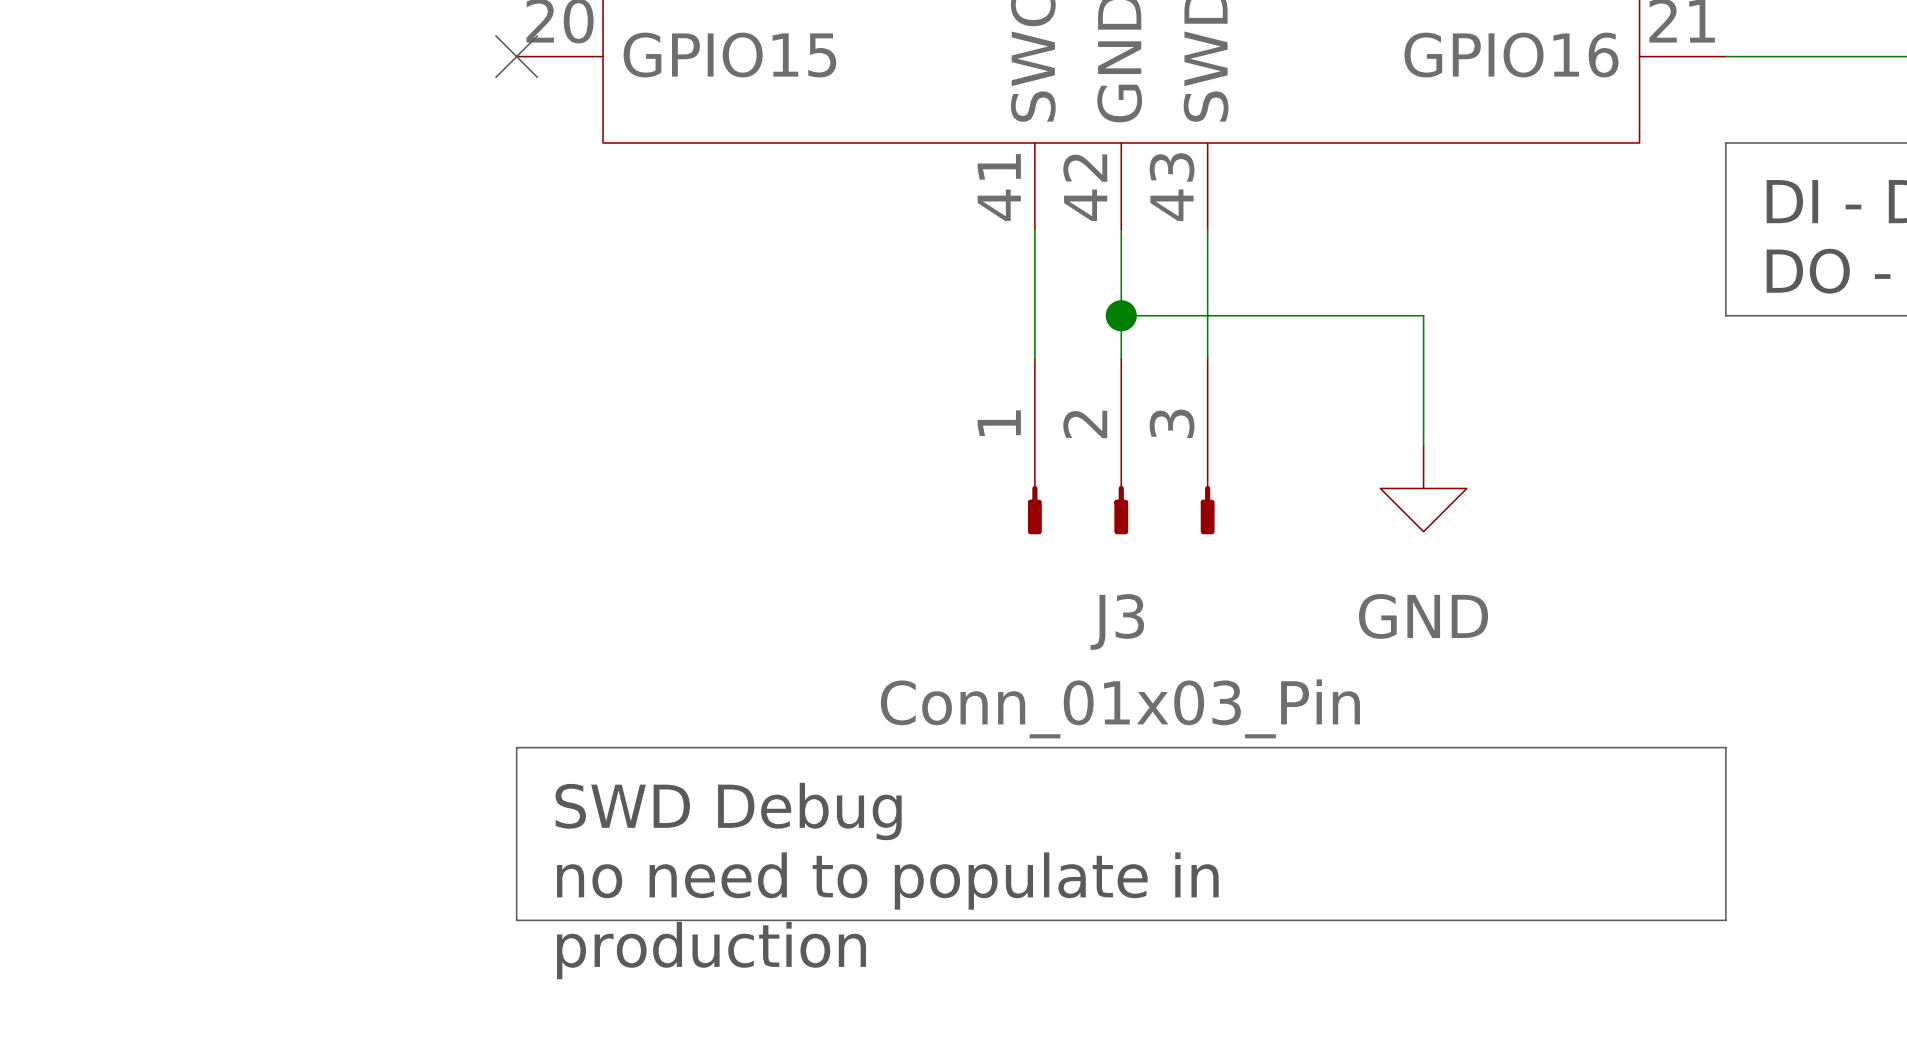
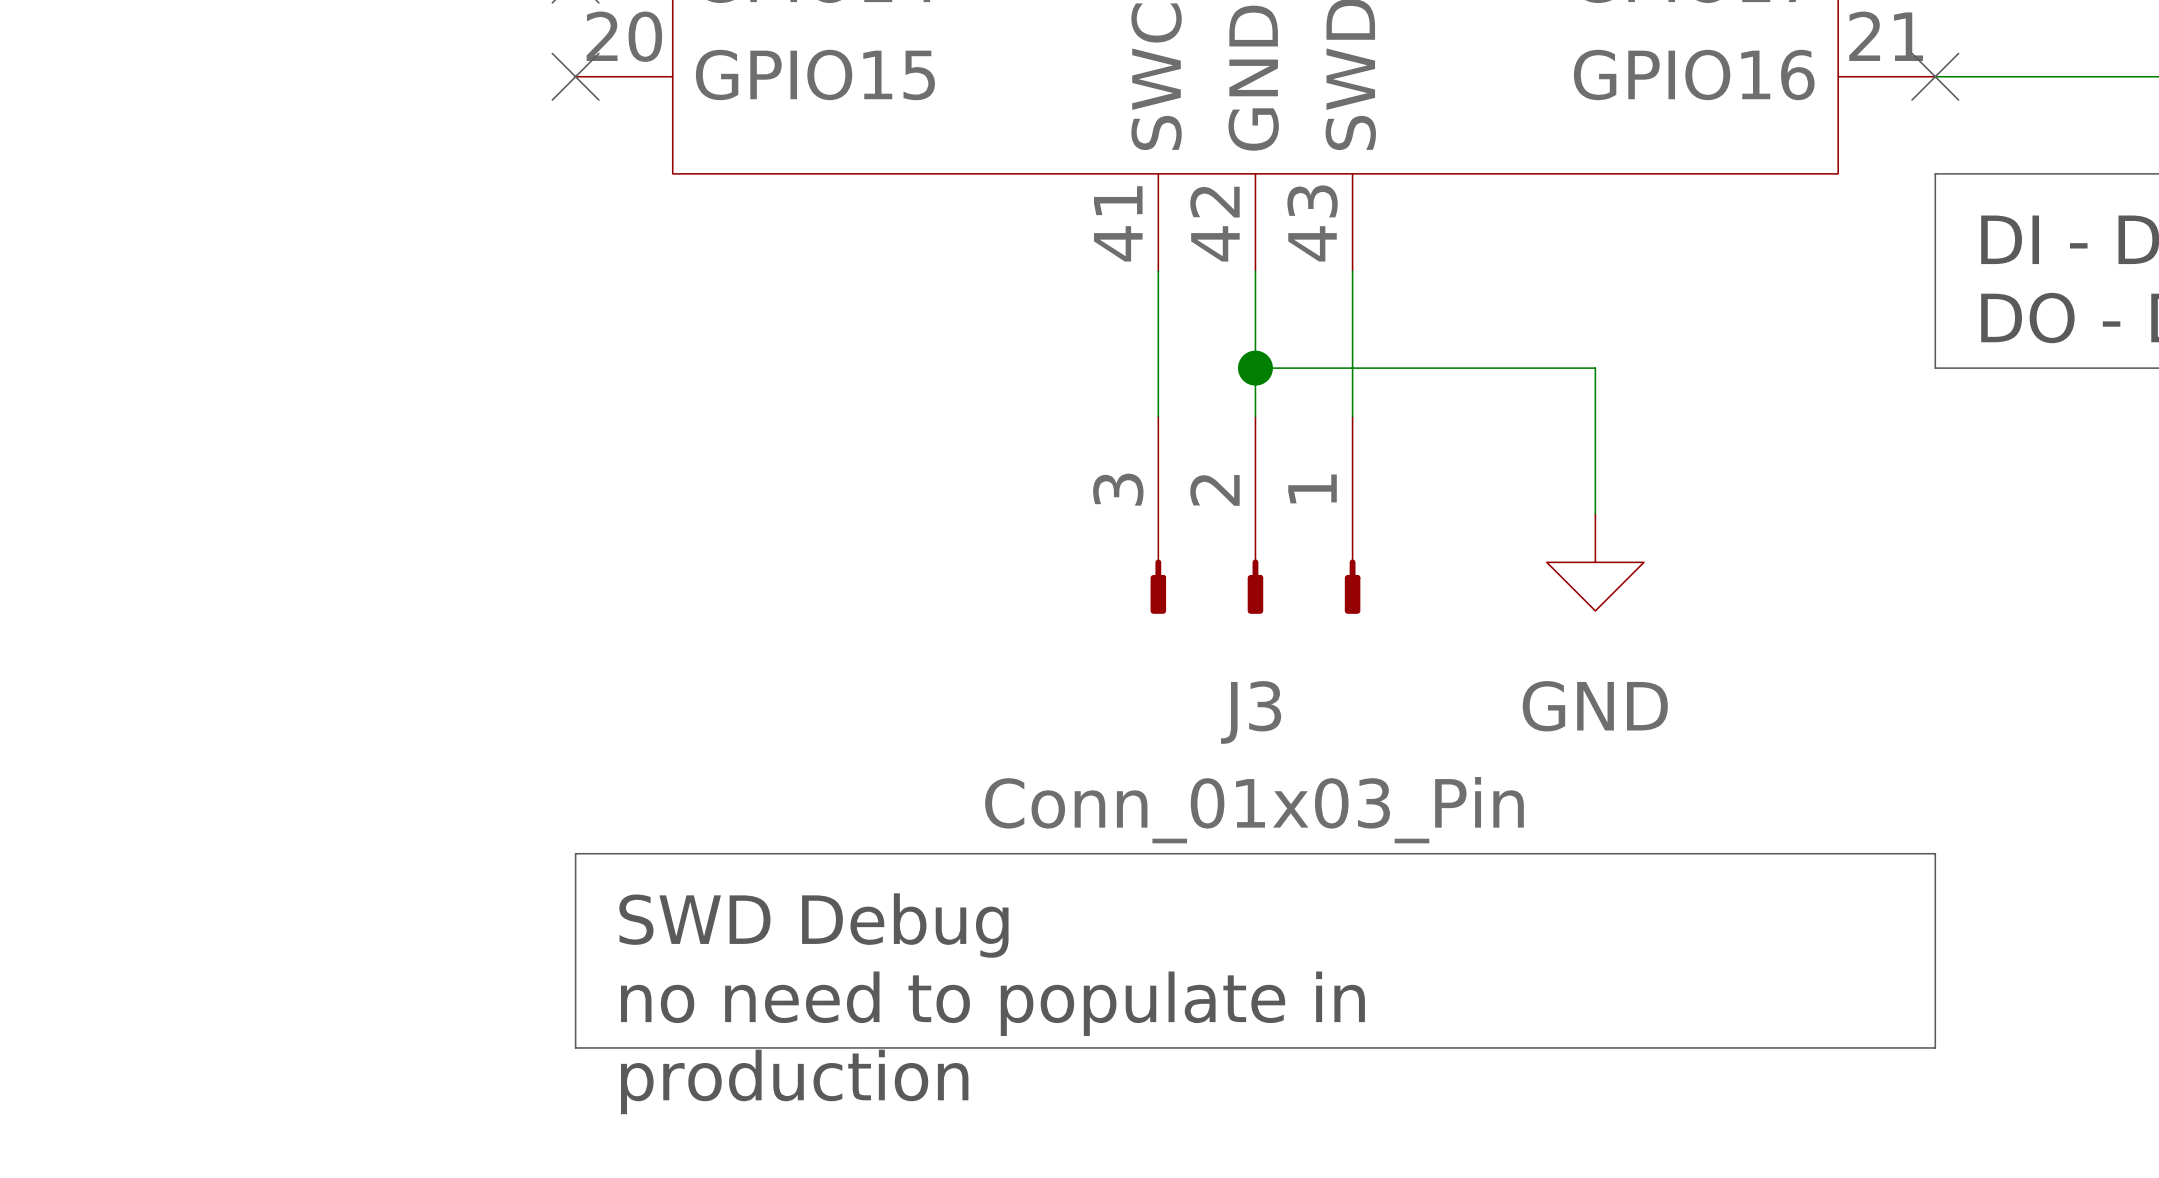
no-connect mark: none -> (1935, 76)
J3 flip: as is (1121, 510) -> left-right (1255, 586)

